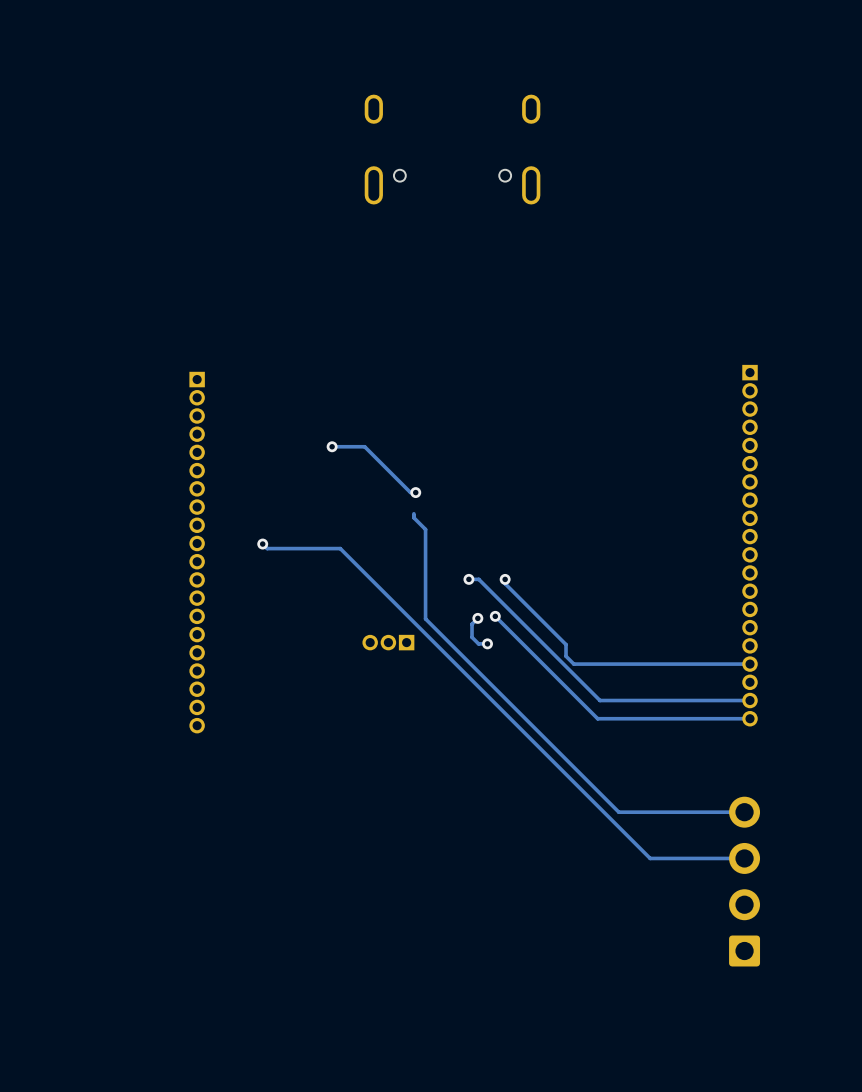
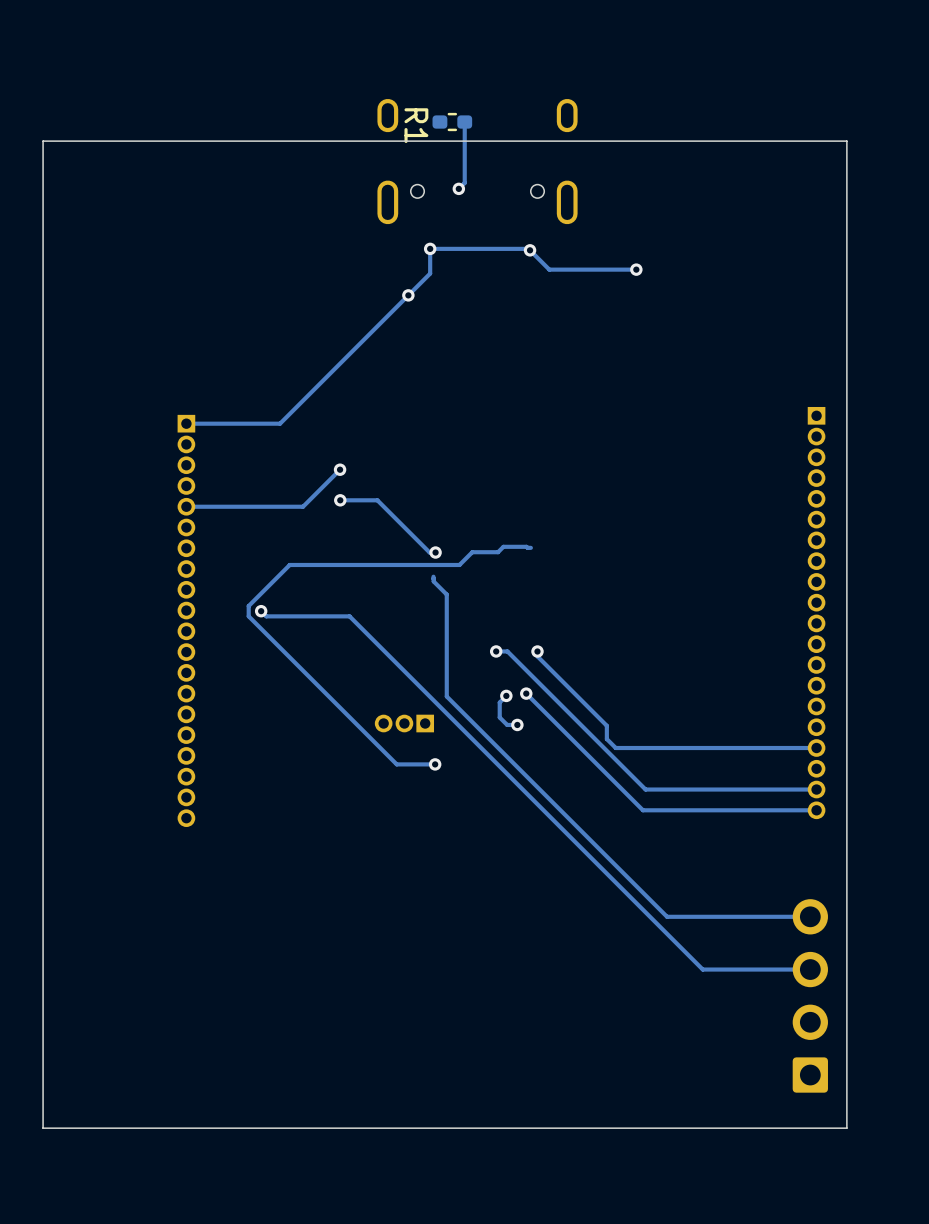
R1: none -> (452, 122)
track: none -> (464, 122) (464, 182) (458, 188)
board edge: none -> (846, 141) (43, 141) (43, 1128) (846, 1128) (846, 141)
via: none -> (458, 188)
via: none -> (430, 248)
via: none -> (530, 250)
track: none -> (636, 269) (549, 269) (528, 248) (430, 248) (430, 273) (280, 423) (186, 423)
via: none -> (636, 269)
via: none -> (408, 295)
track: none -> (340, 469) (303, 506) (186, 506)
via: none -> (340, 469)
track: none -> (530, 547) (503, 546) (498, 552) (472, 552) (459, 564) (289, 564) (248, 606) (248, 616) (396, 764) (435, 764)
via: none -> (435, 764)

